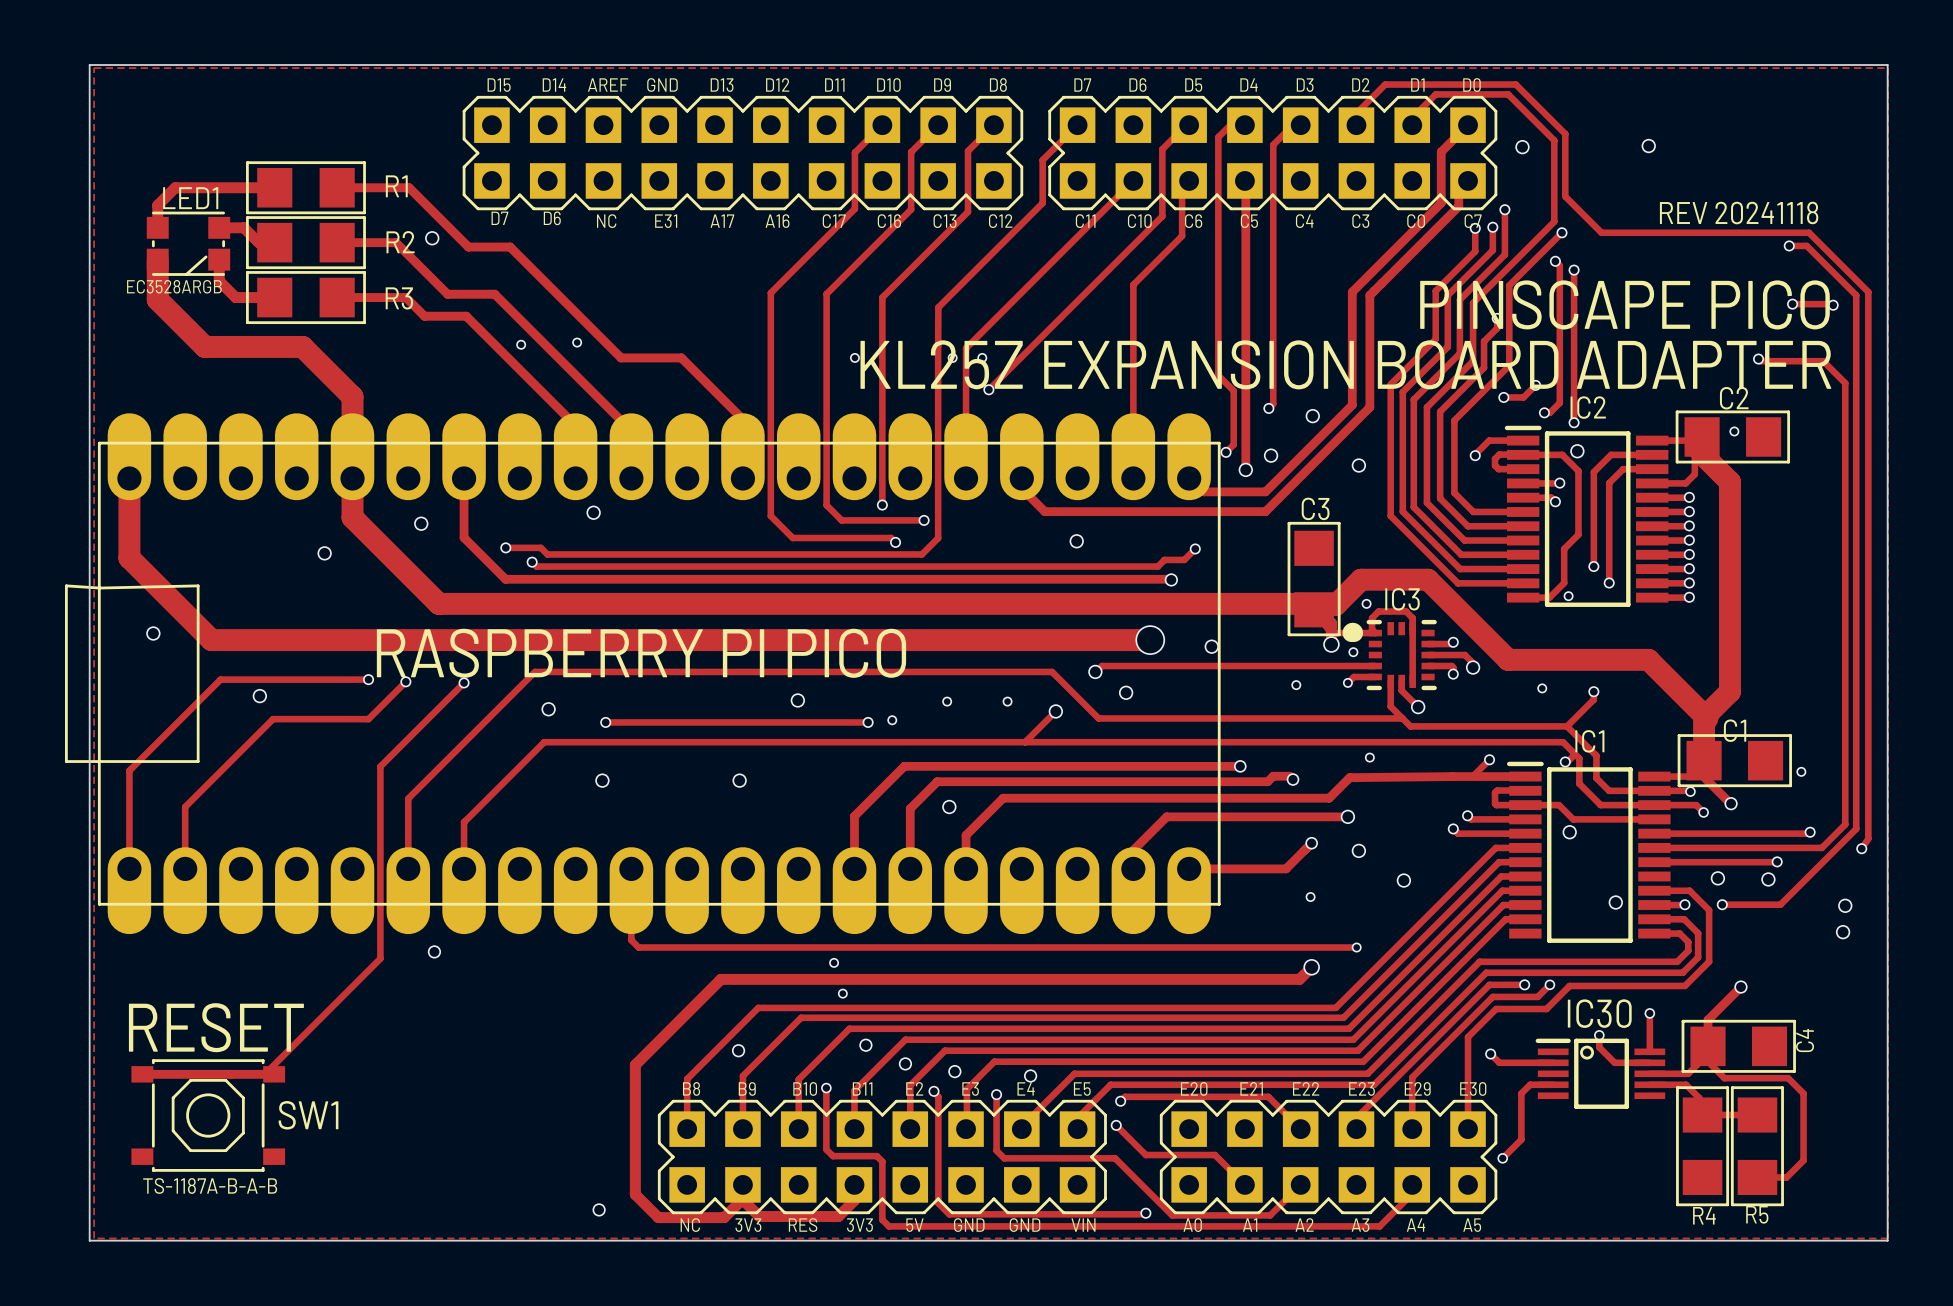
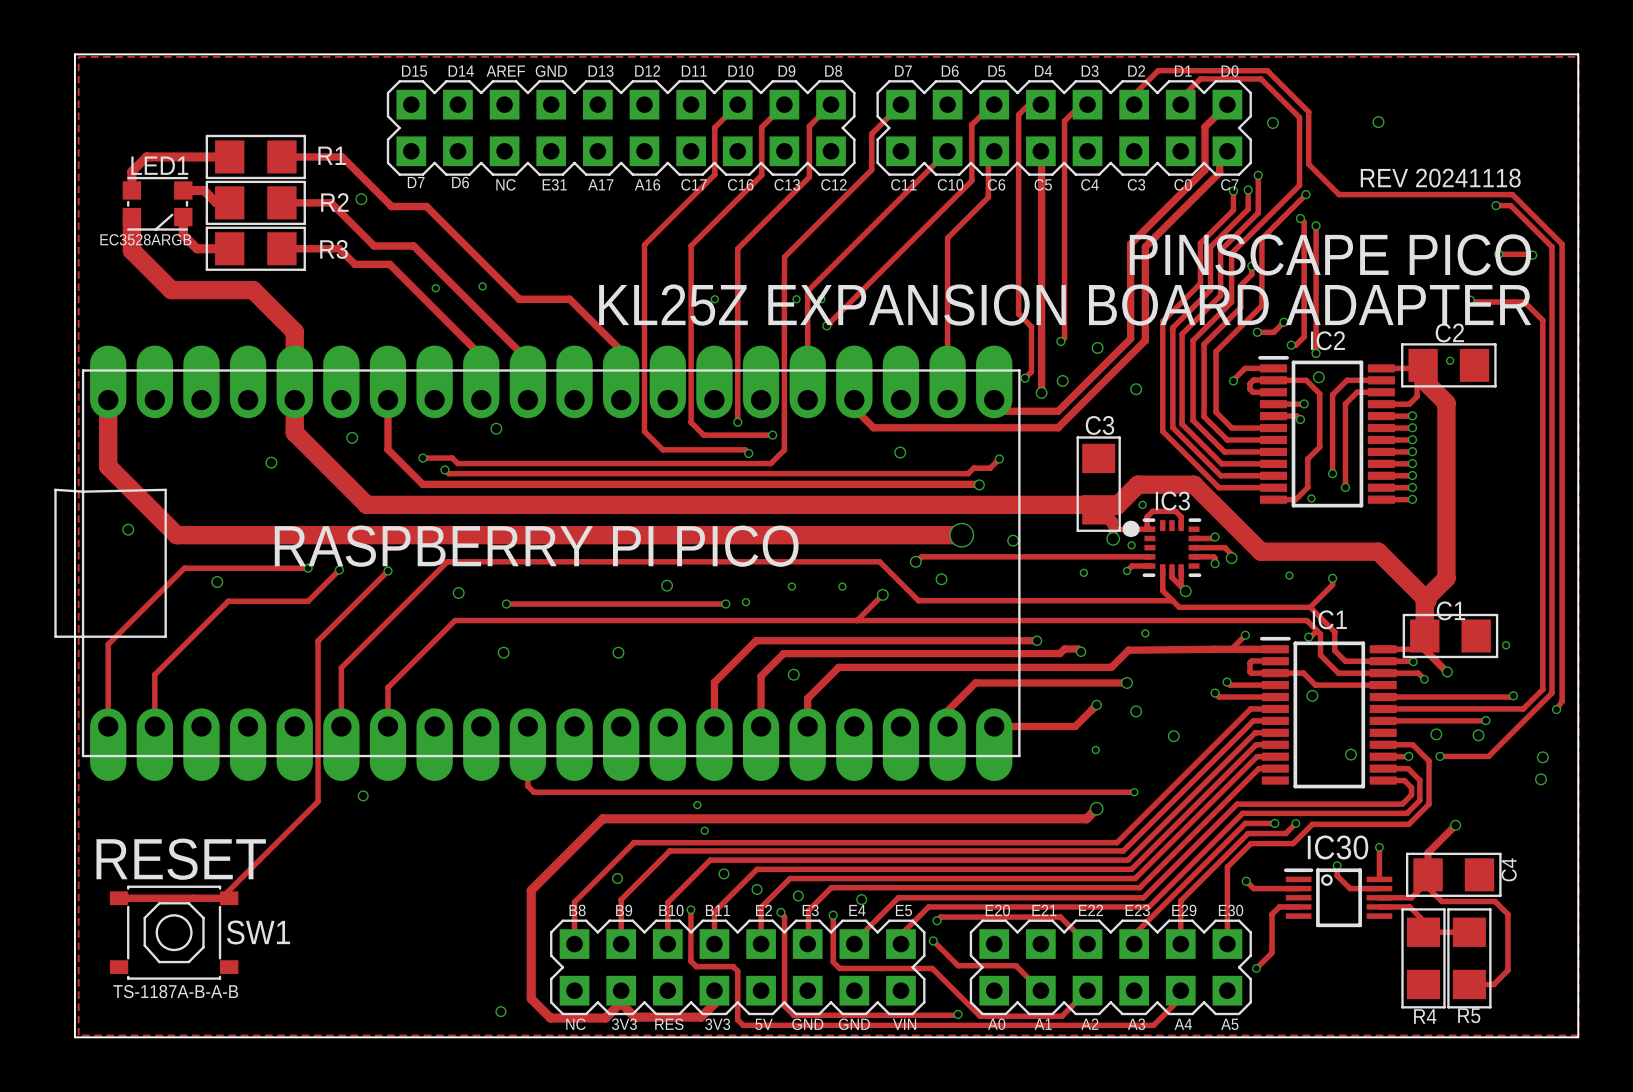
track: (1412, 628) (1412, 681) -> (1181, 586) (1181, 569)

